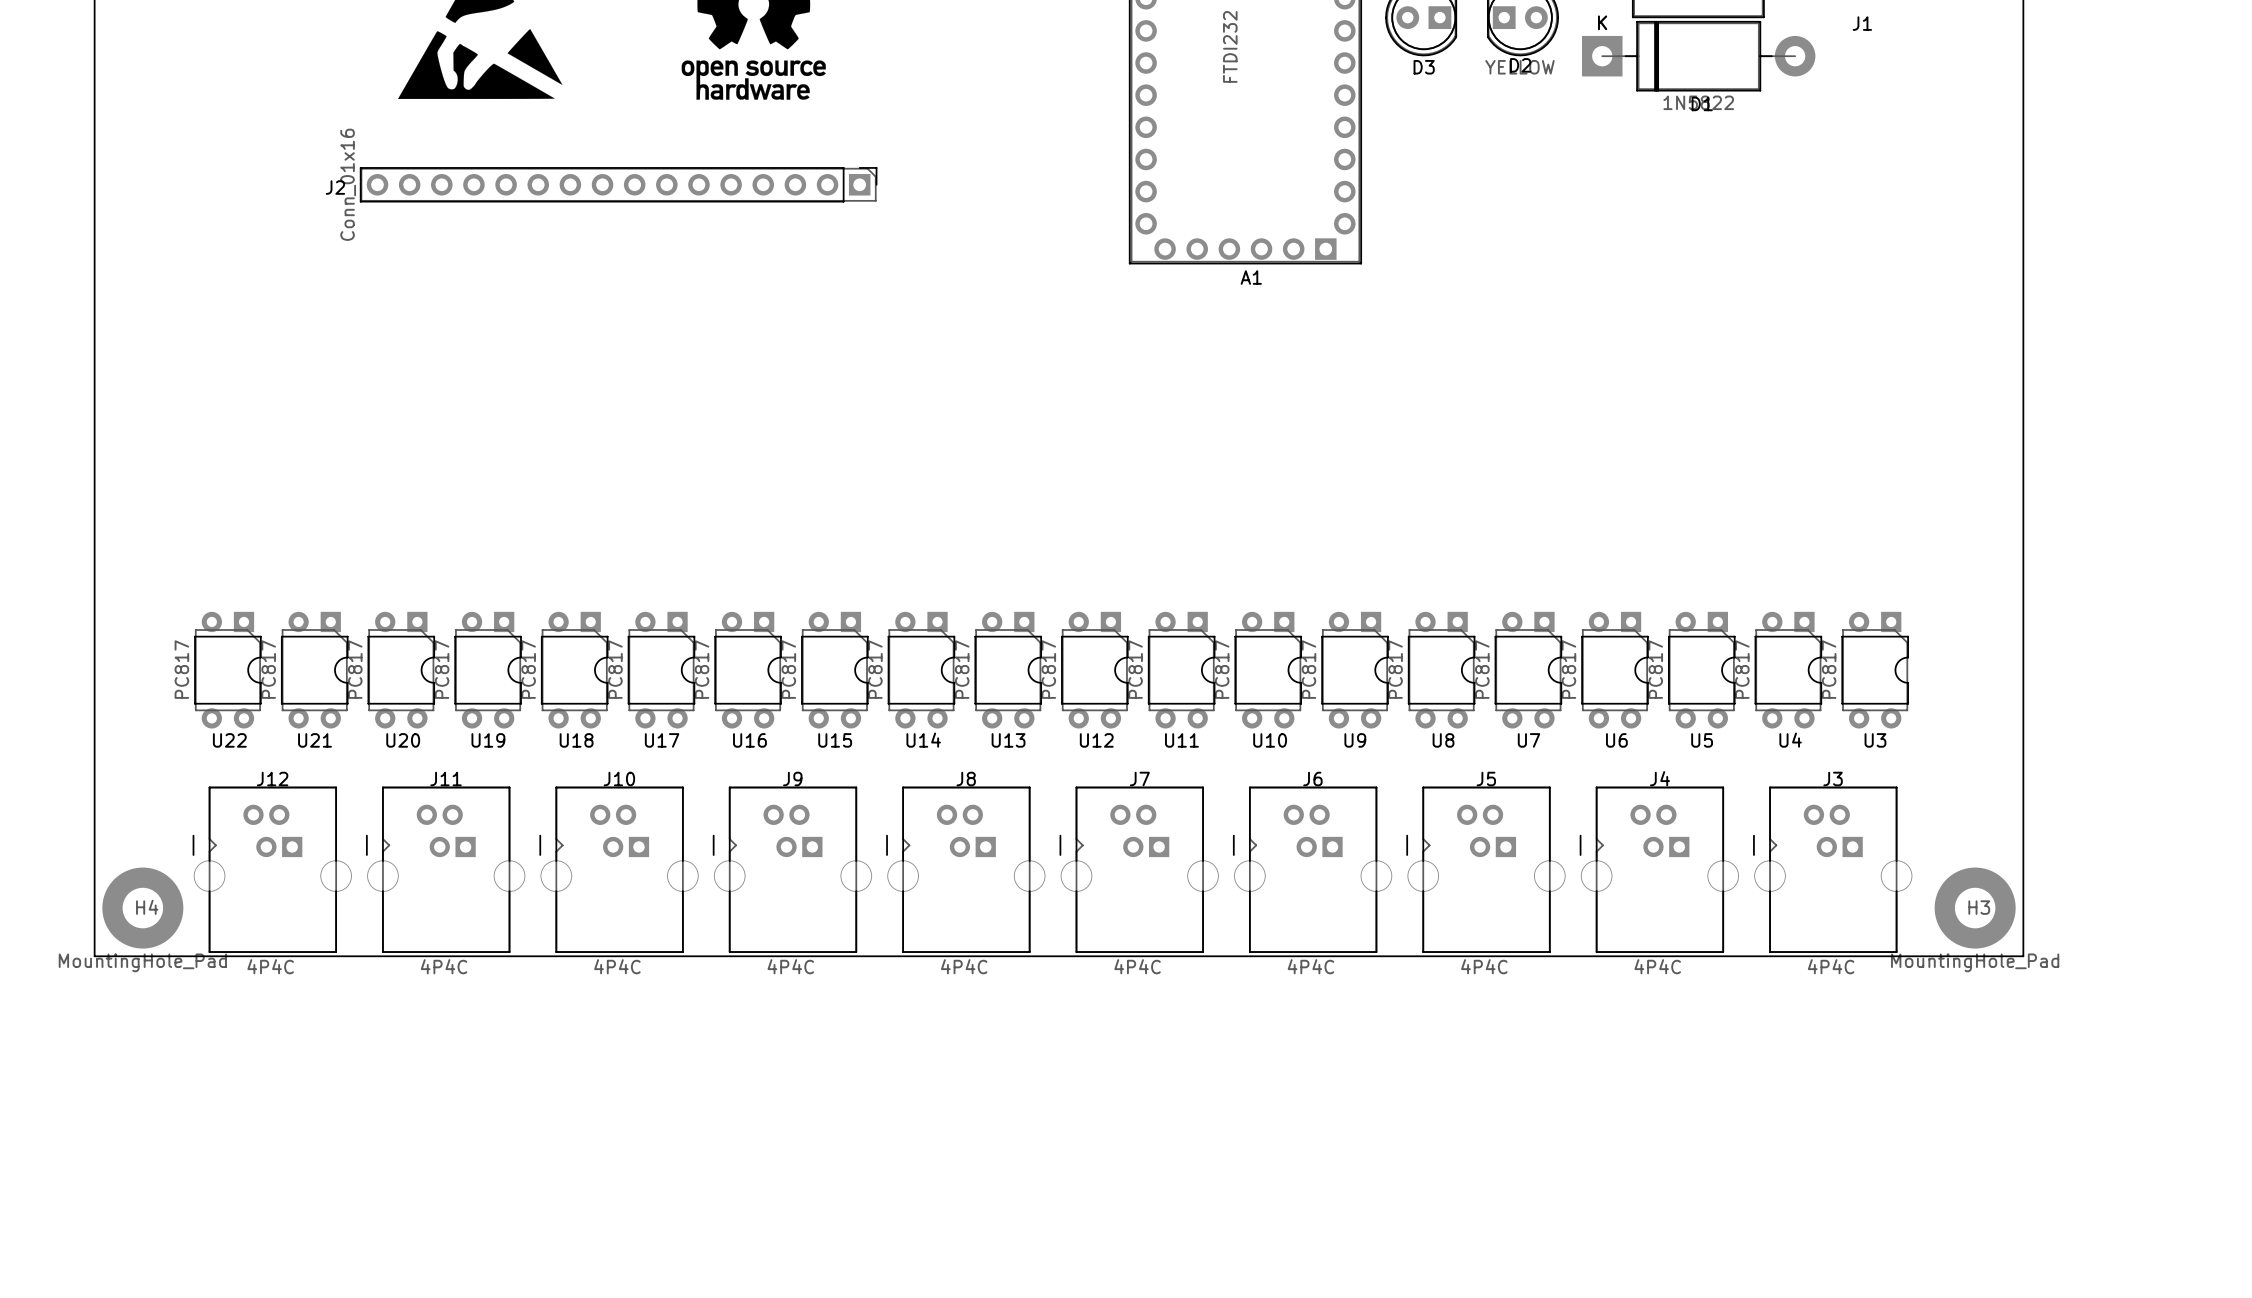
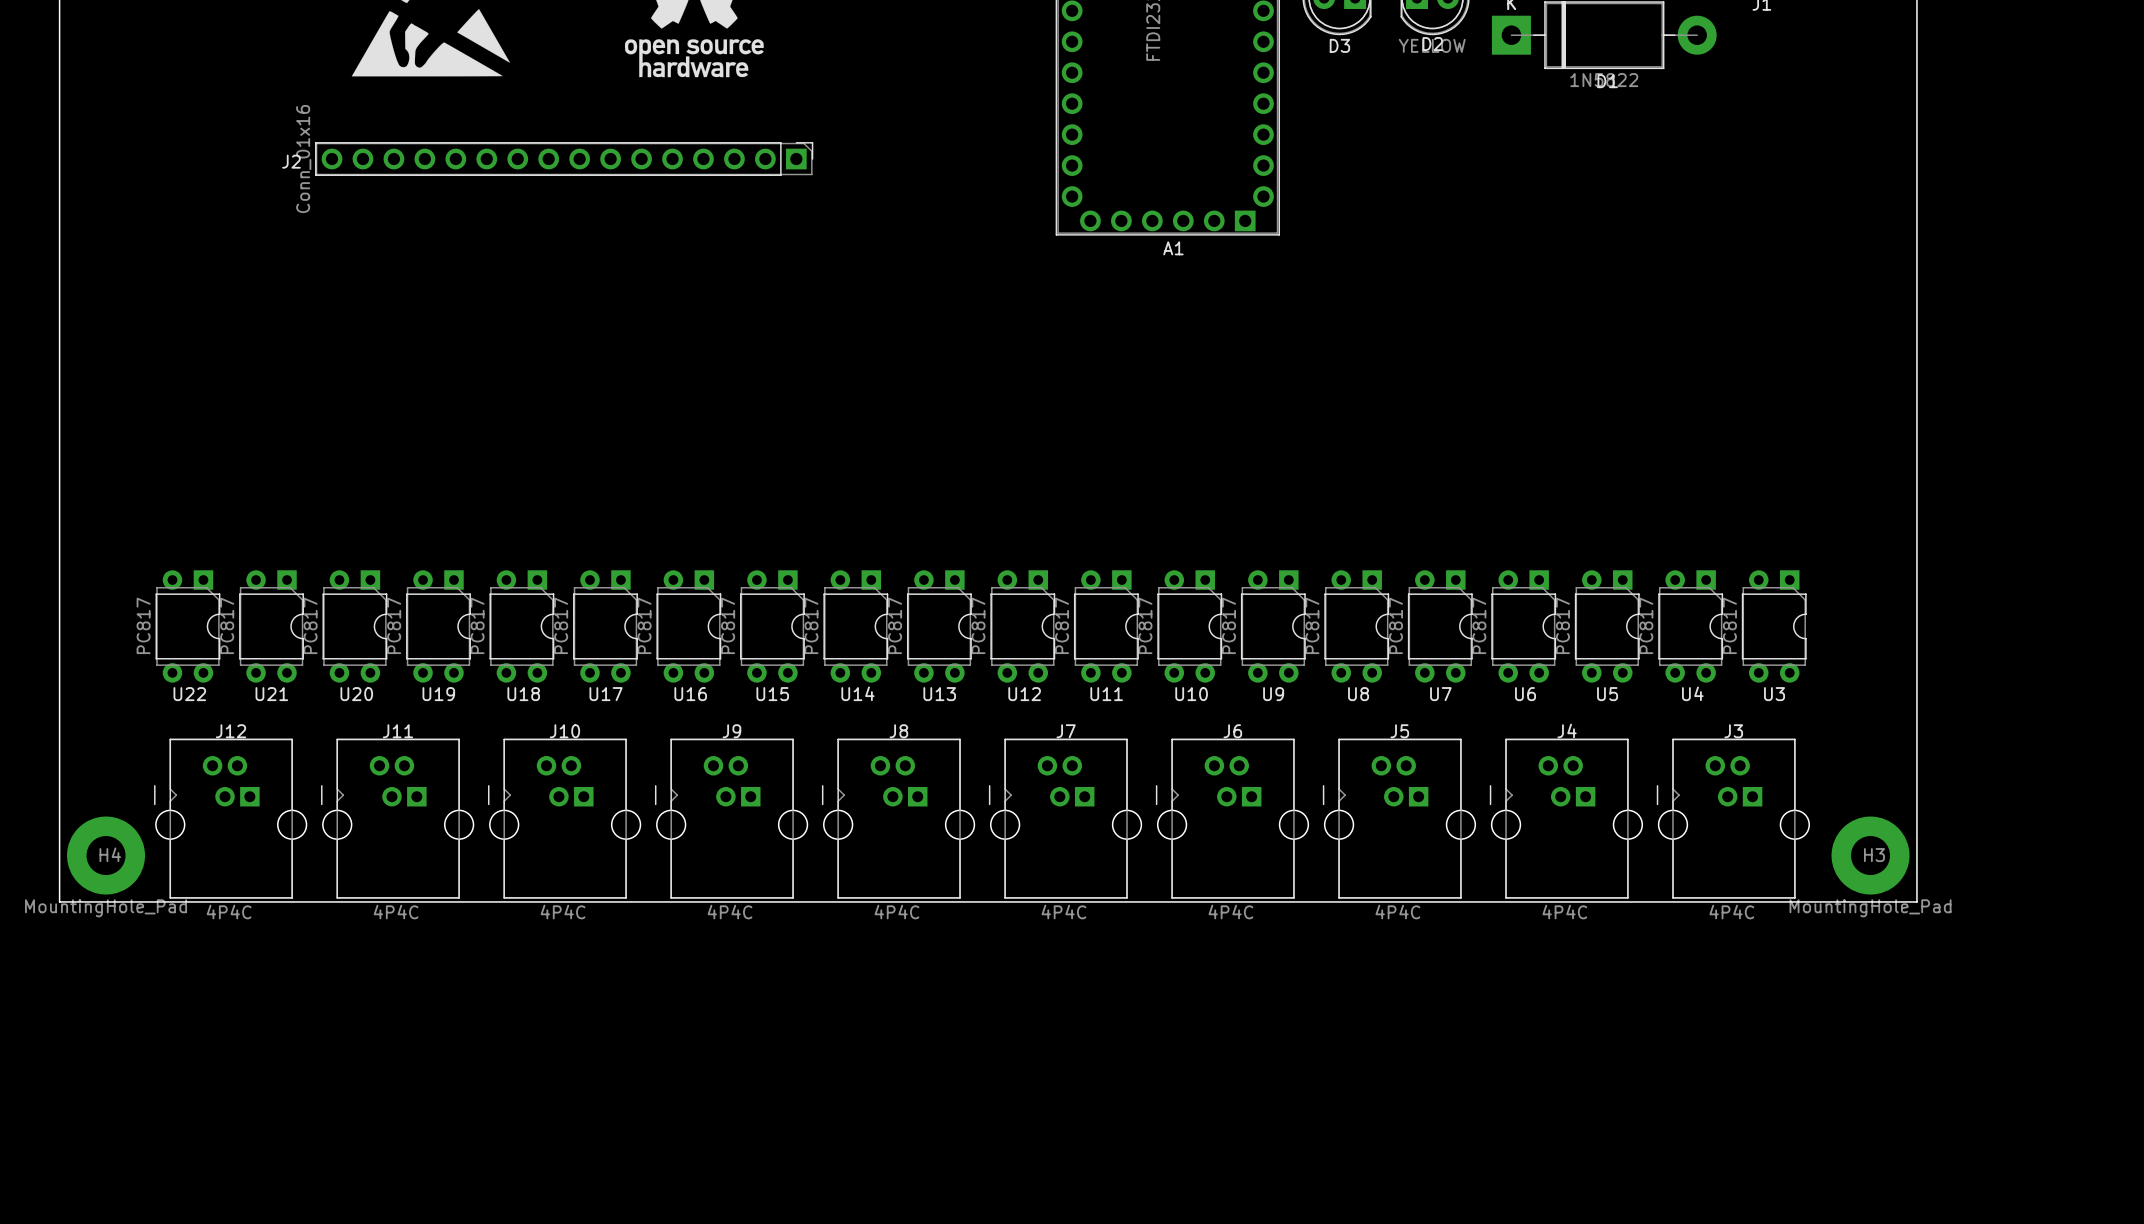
J12 footprint: [192, 786, 352, 953] -> [154, 738, 307, 899]
J11 footprint: [366, 786, 526, 953] -> [321, 738, 474, 899]
J10 footprint: [539, 786, 699, 953] -> [488, 738, 641, 899]
J9 footprint: [712, 786, 873, 953] -> [654, 738, 808, 899]
J8 footprint: [886, 786, 1046, 953] -> [821, 738, 975, 899]
J7 footprint: [1059, 786, 1219, 953] -> [988, 738, 1142, 899]
J6 footprint: [1233, 786, 1393, 953] -> [1155, 738, 1309, 899]
J5 footprint: [1406, 786, 1566, 953] -> [1322, 738, 1476, 899]
J4 footprint: [1579, 786, 1740, 953] -> [1489, 738, 1643, 899]
J3 footprint: [1753, 786, 1913, 953] -> [1656, 738, 1810, 899]

